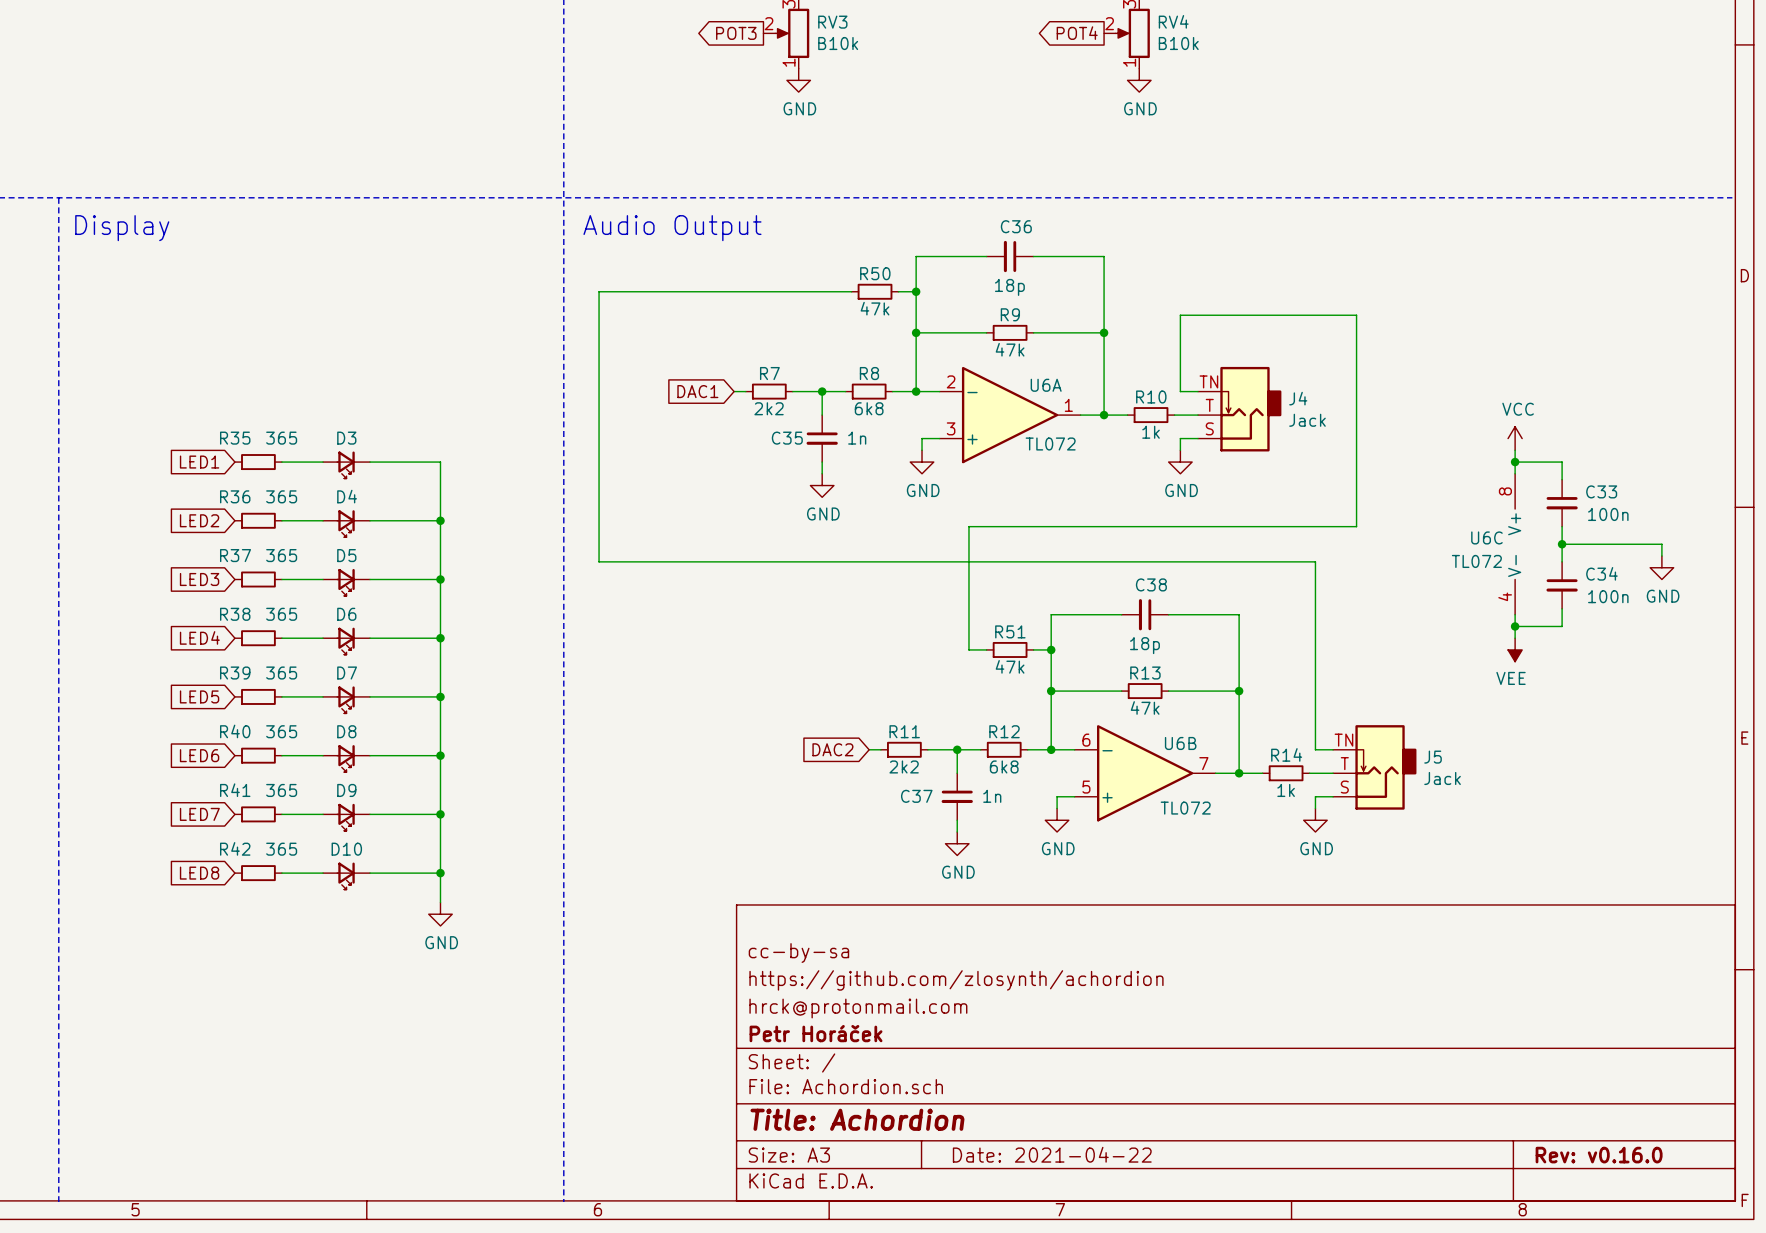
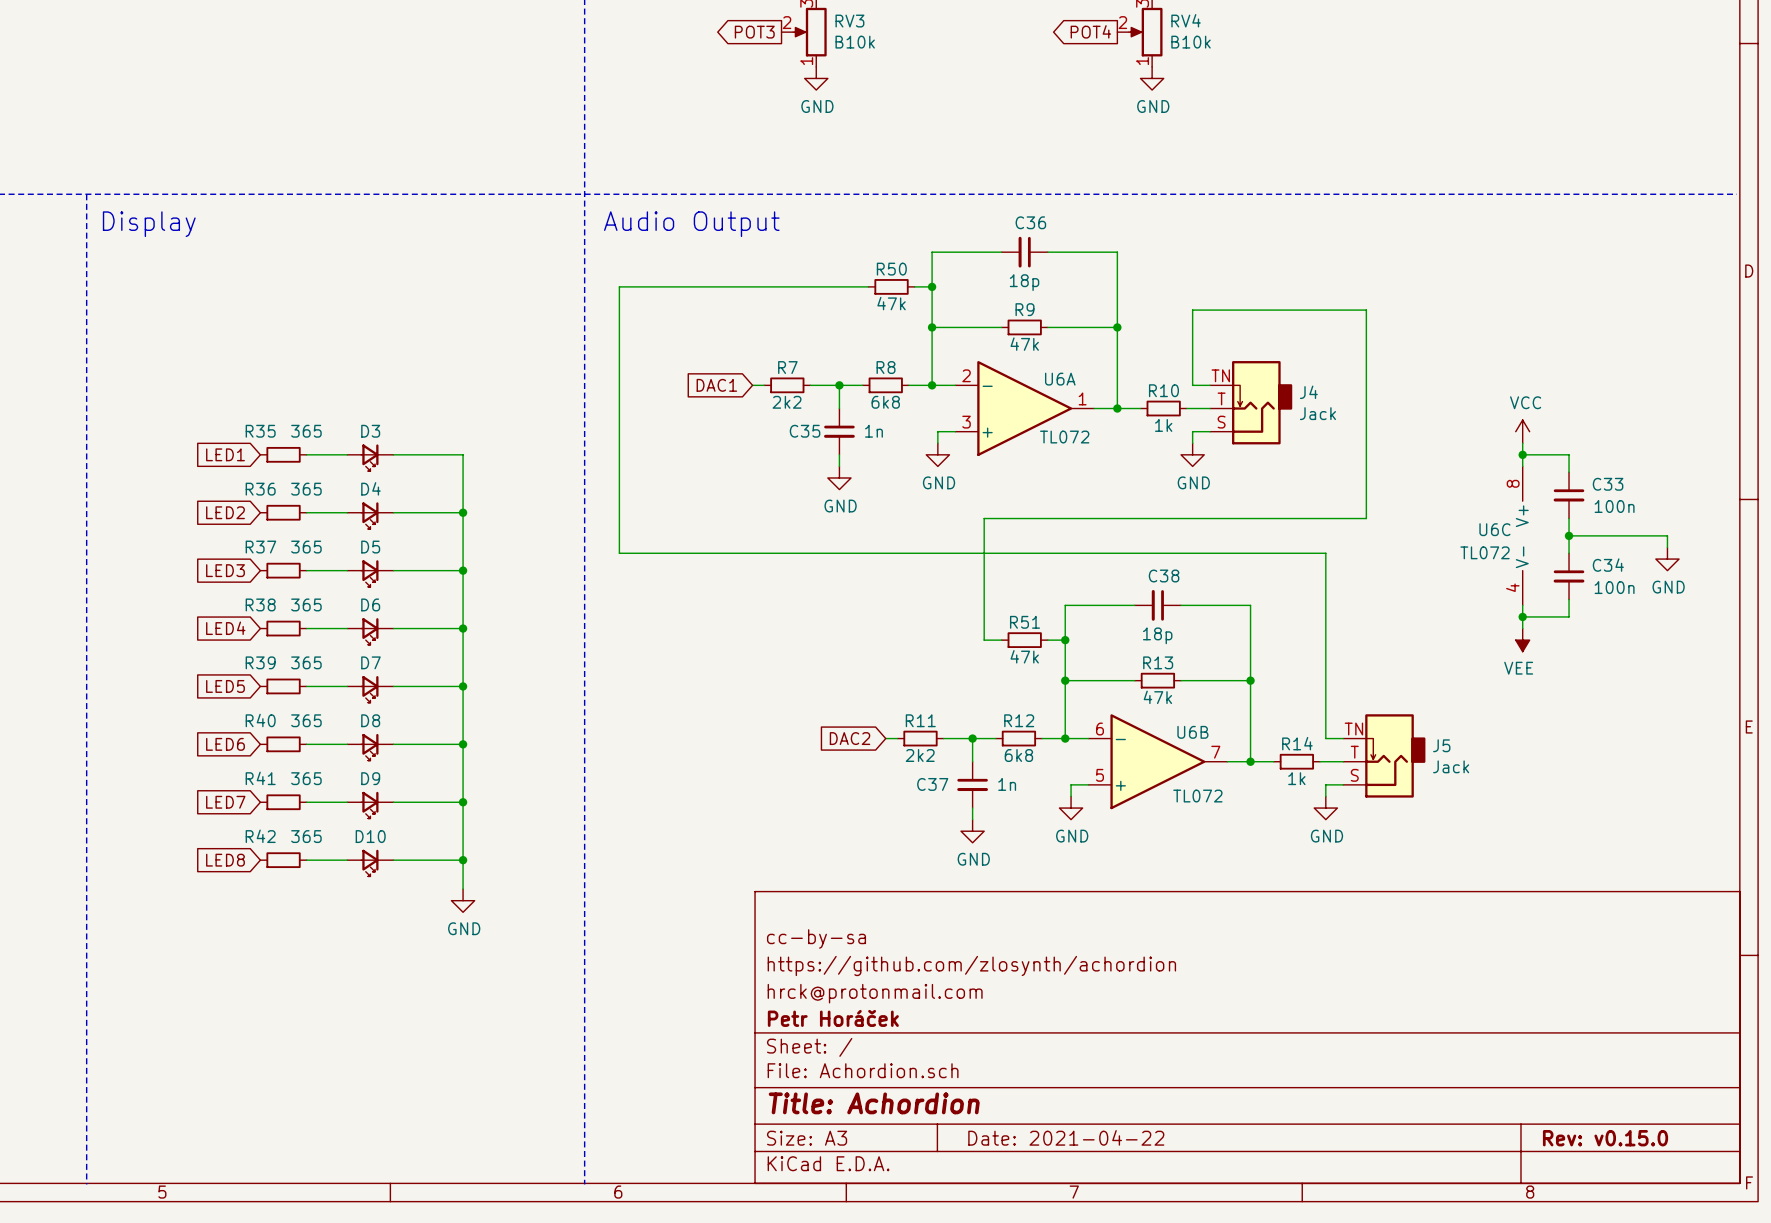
title block: Rev: v0.16.0 (1599, 1155) -> Rev: v0.15.0 (1605, 1138)

